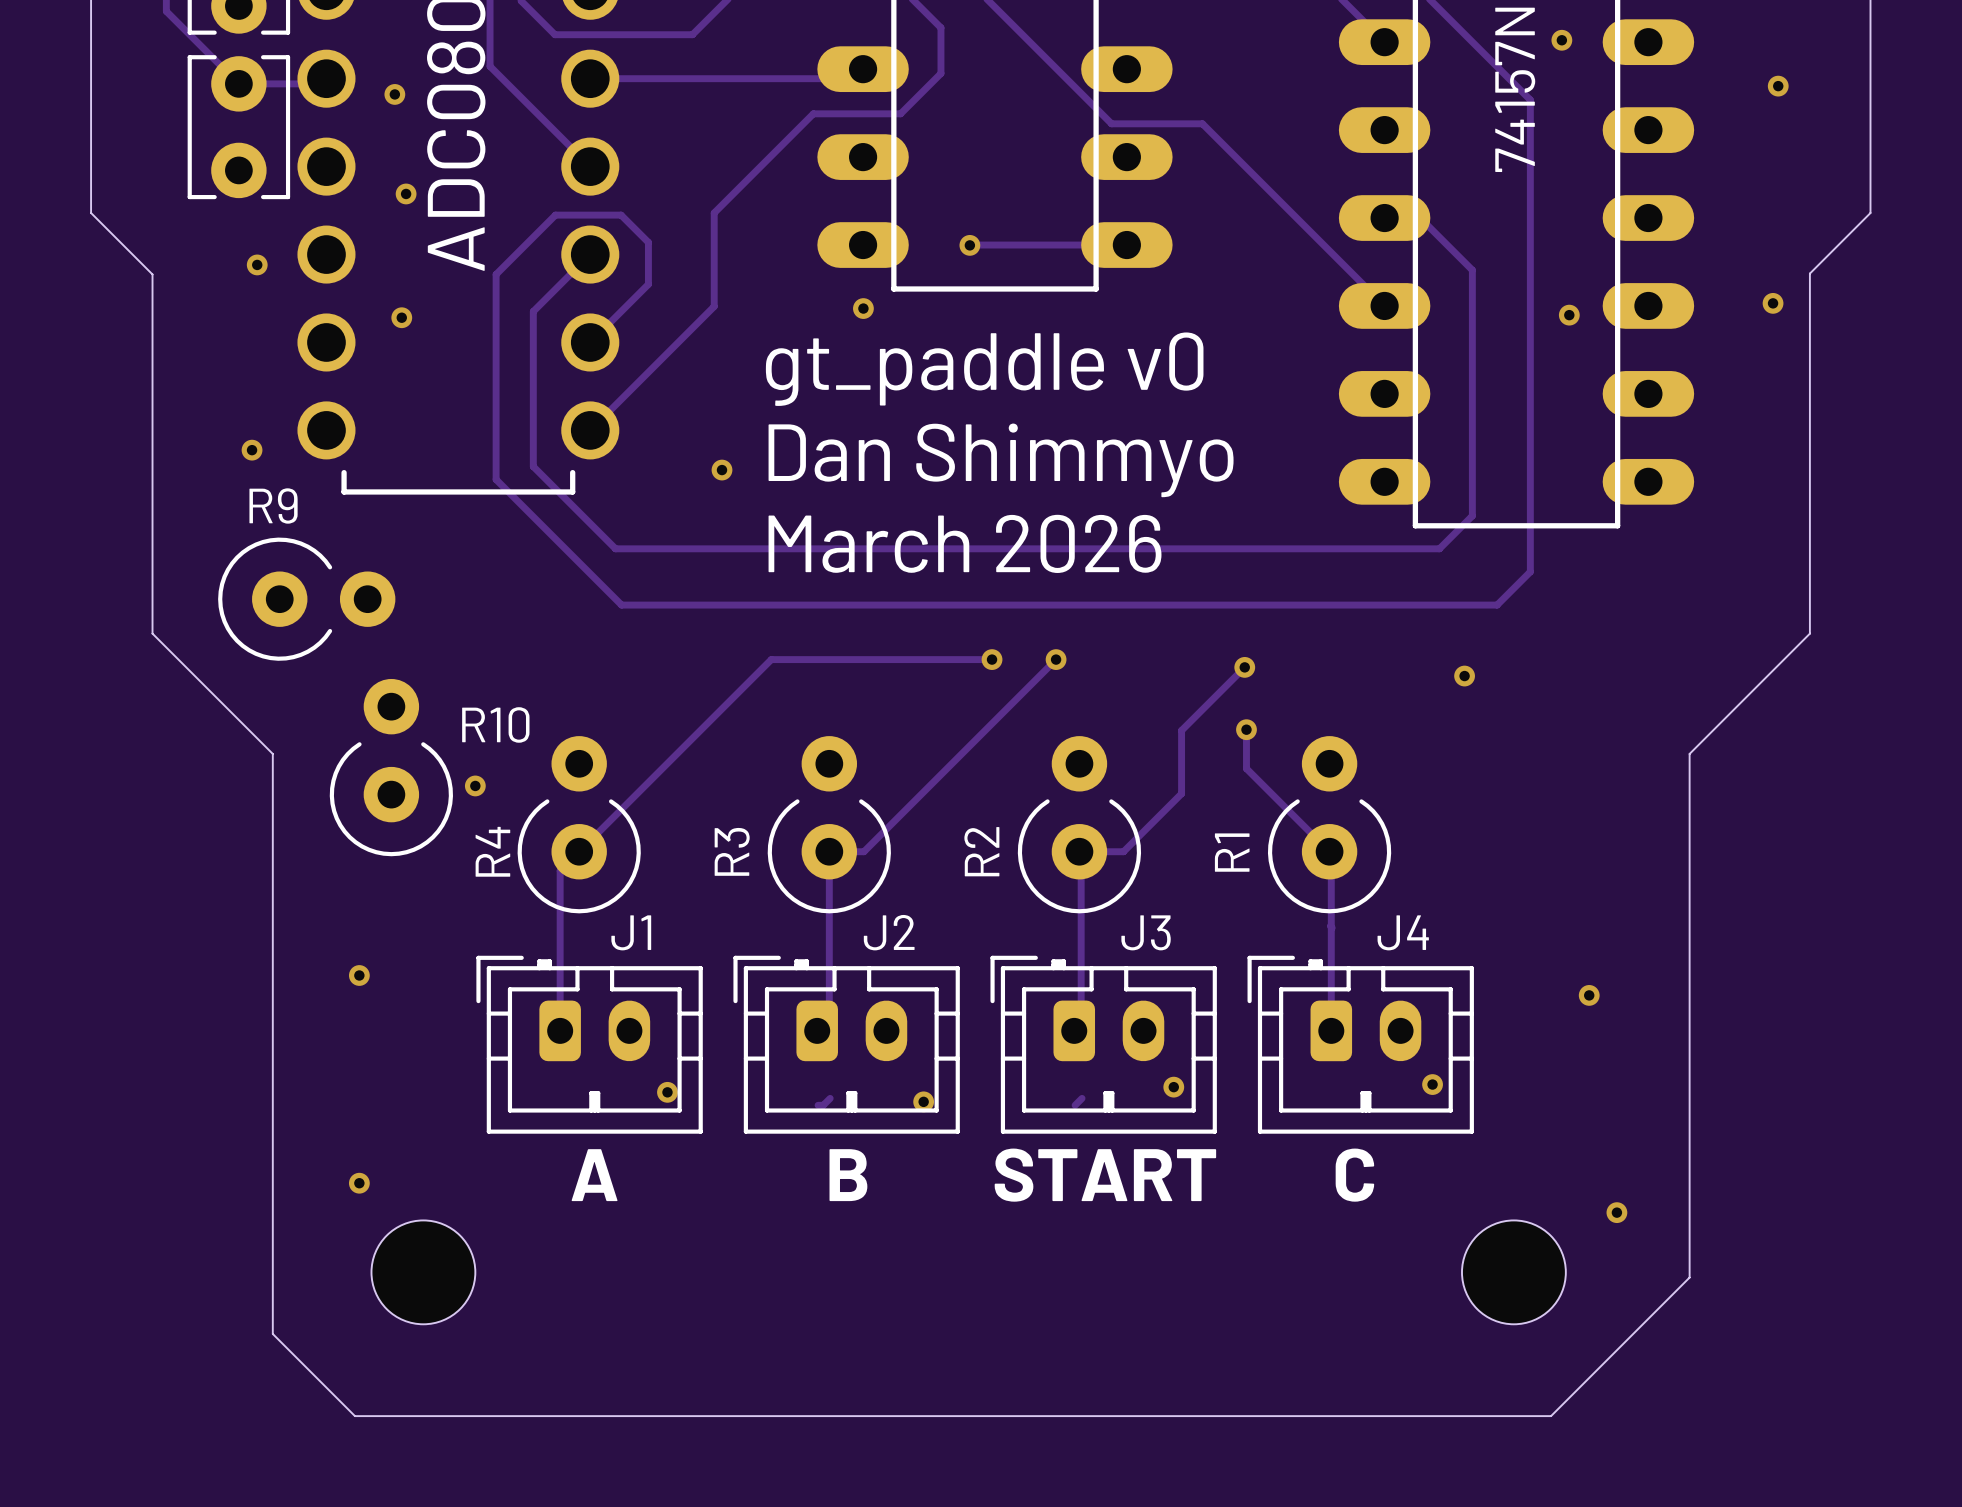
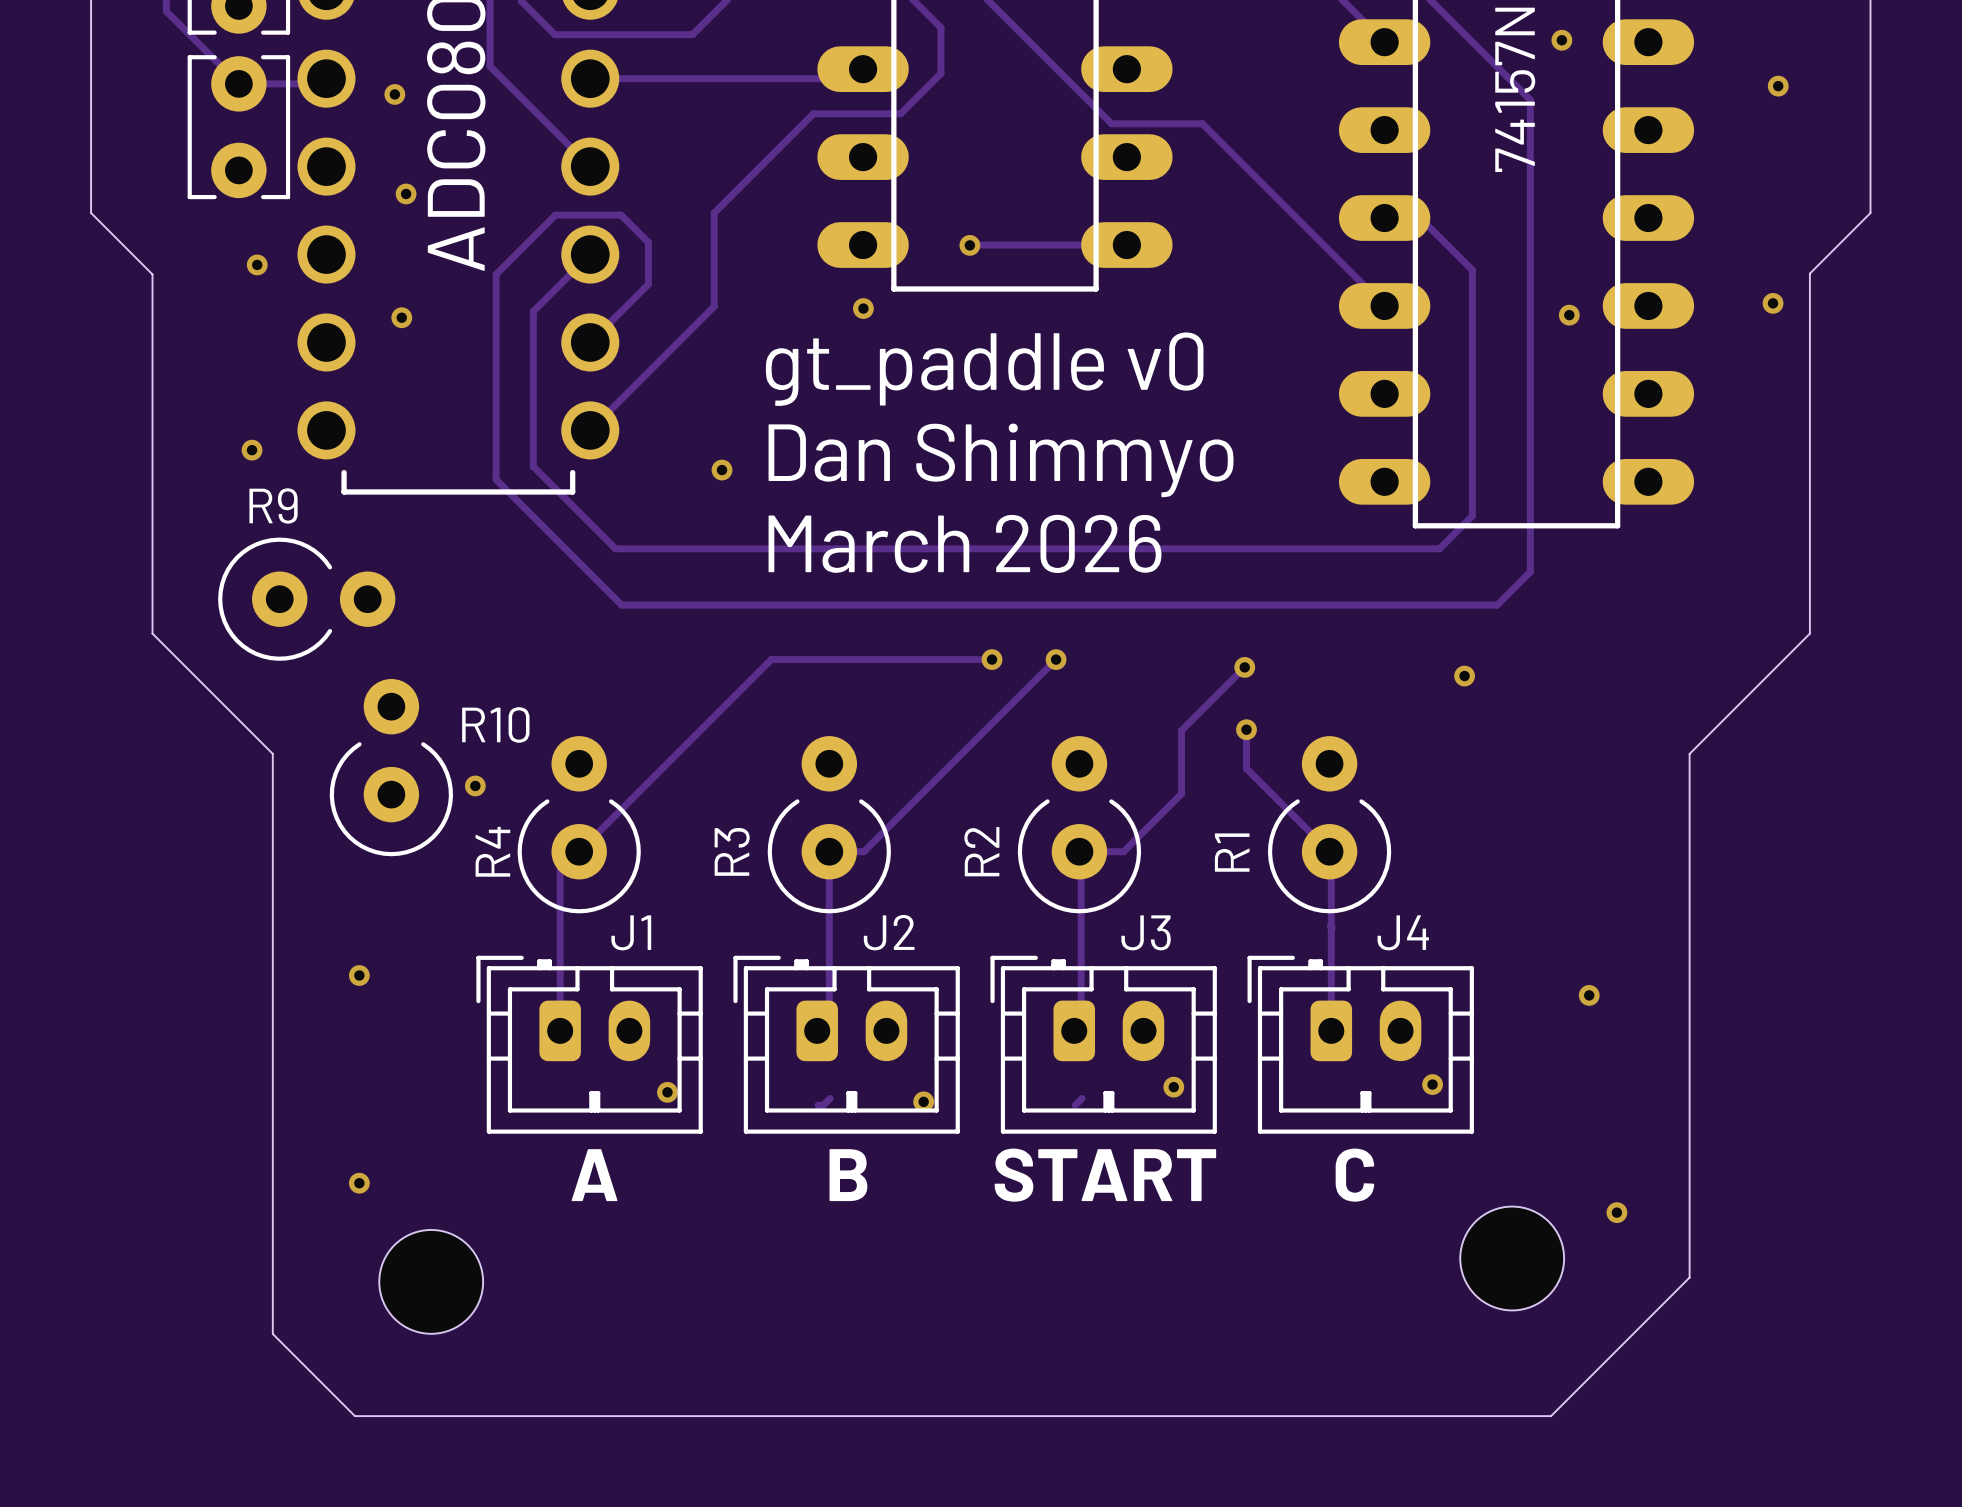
part position: (423, 1272) -> (431, 1281)
part position: (1513, 1272) -> (1512, 1258)

